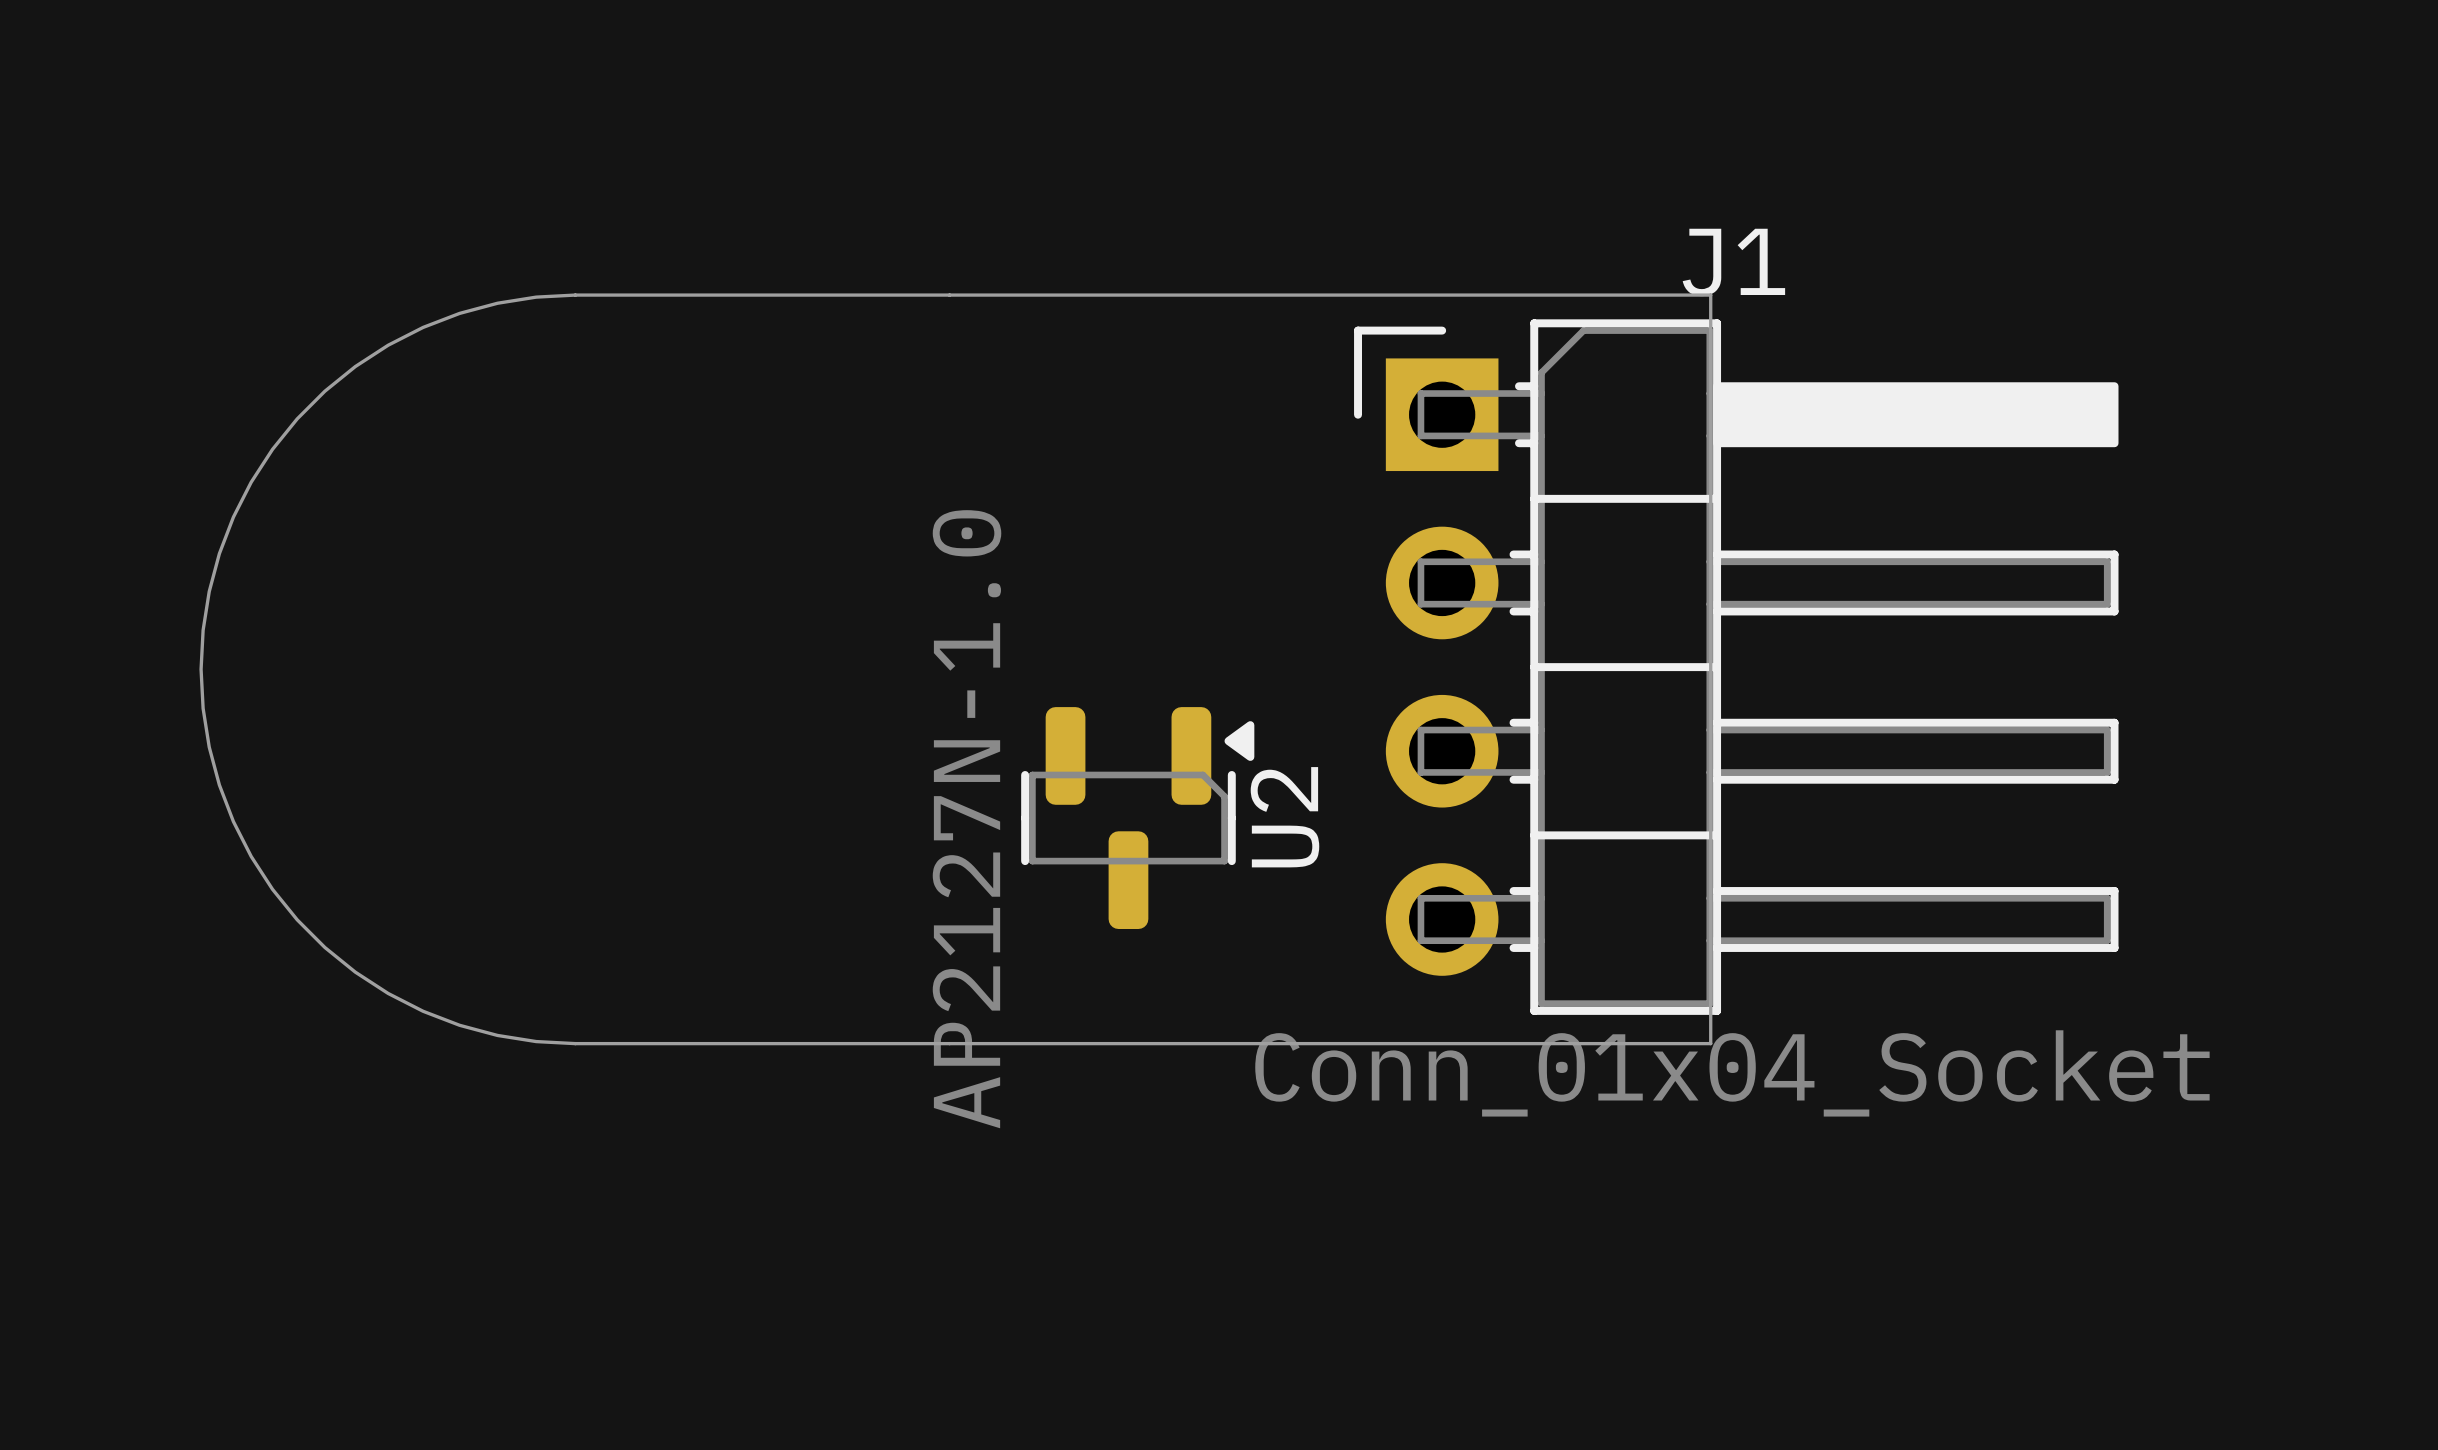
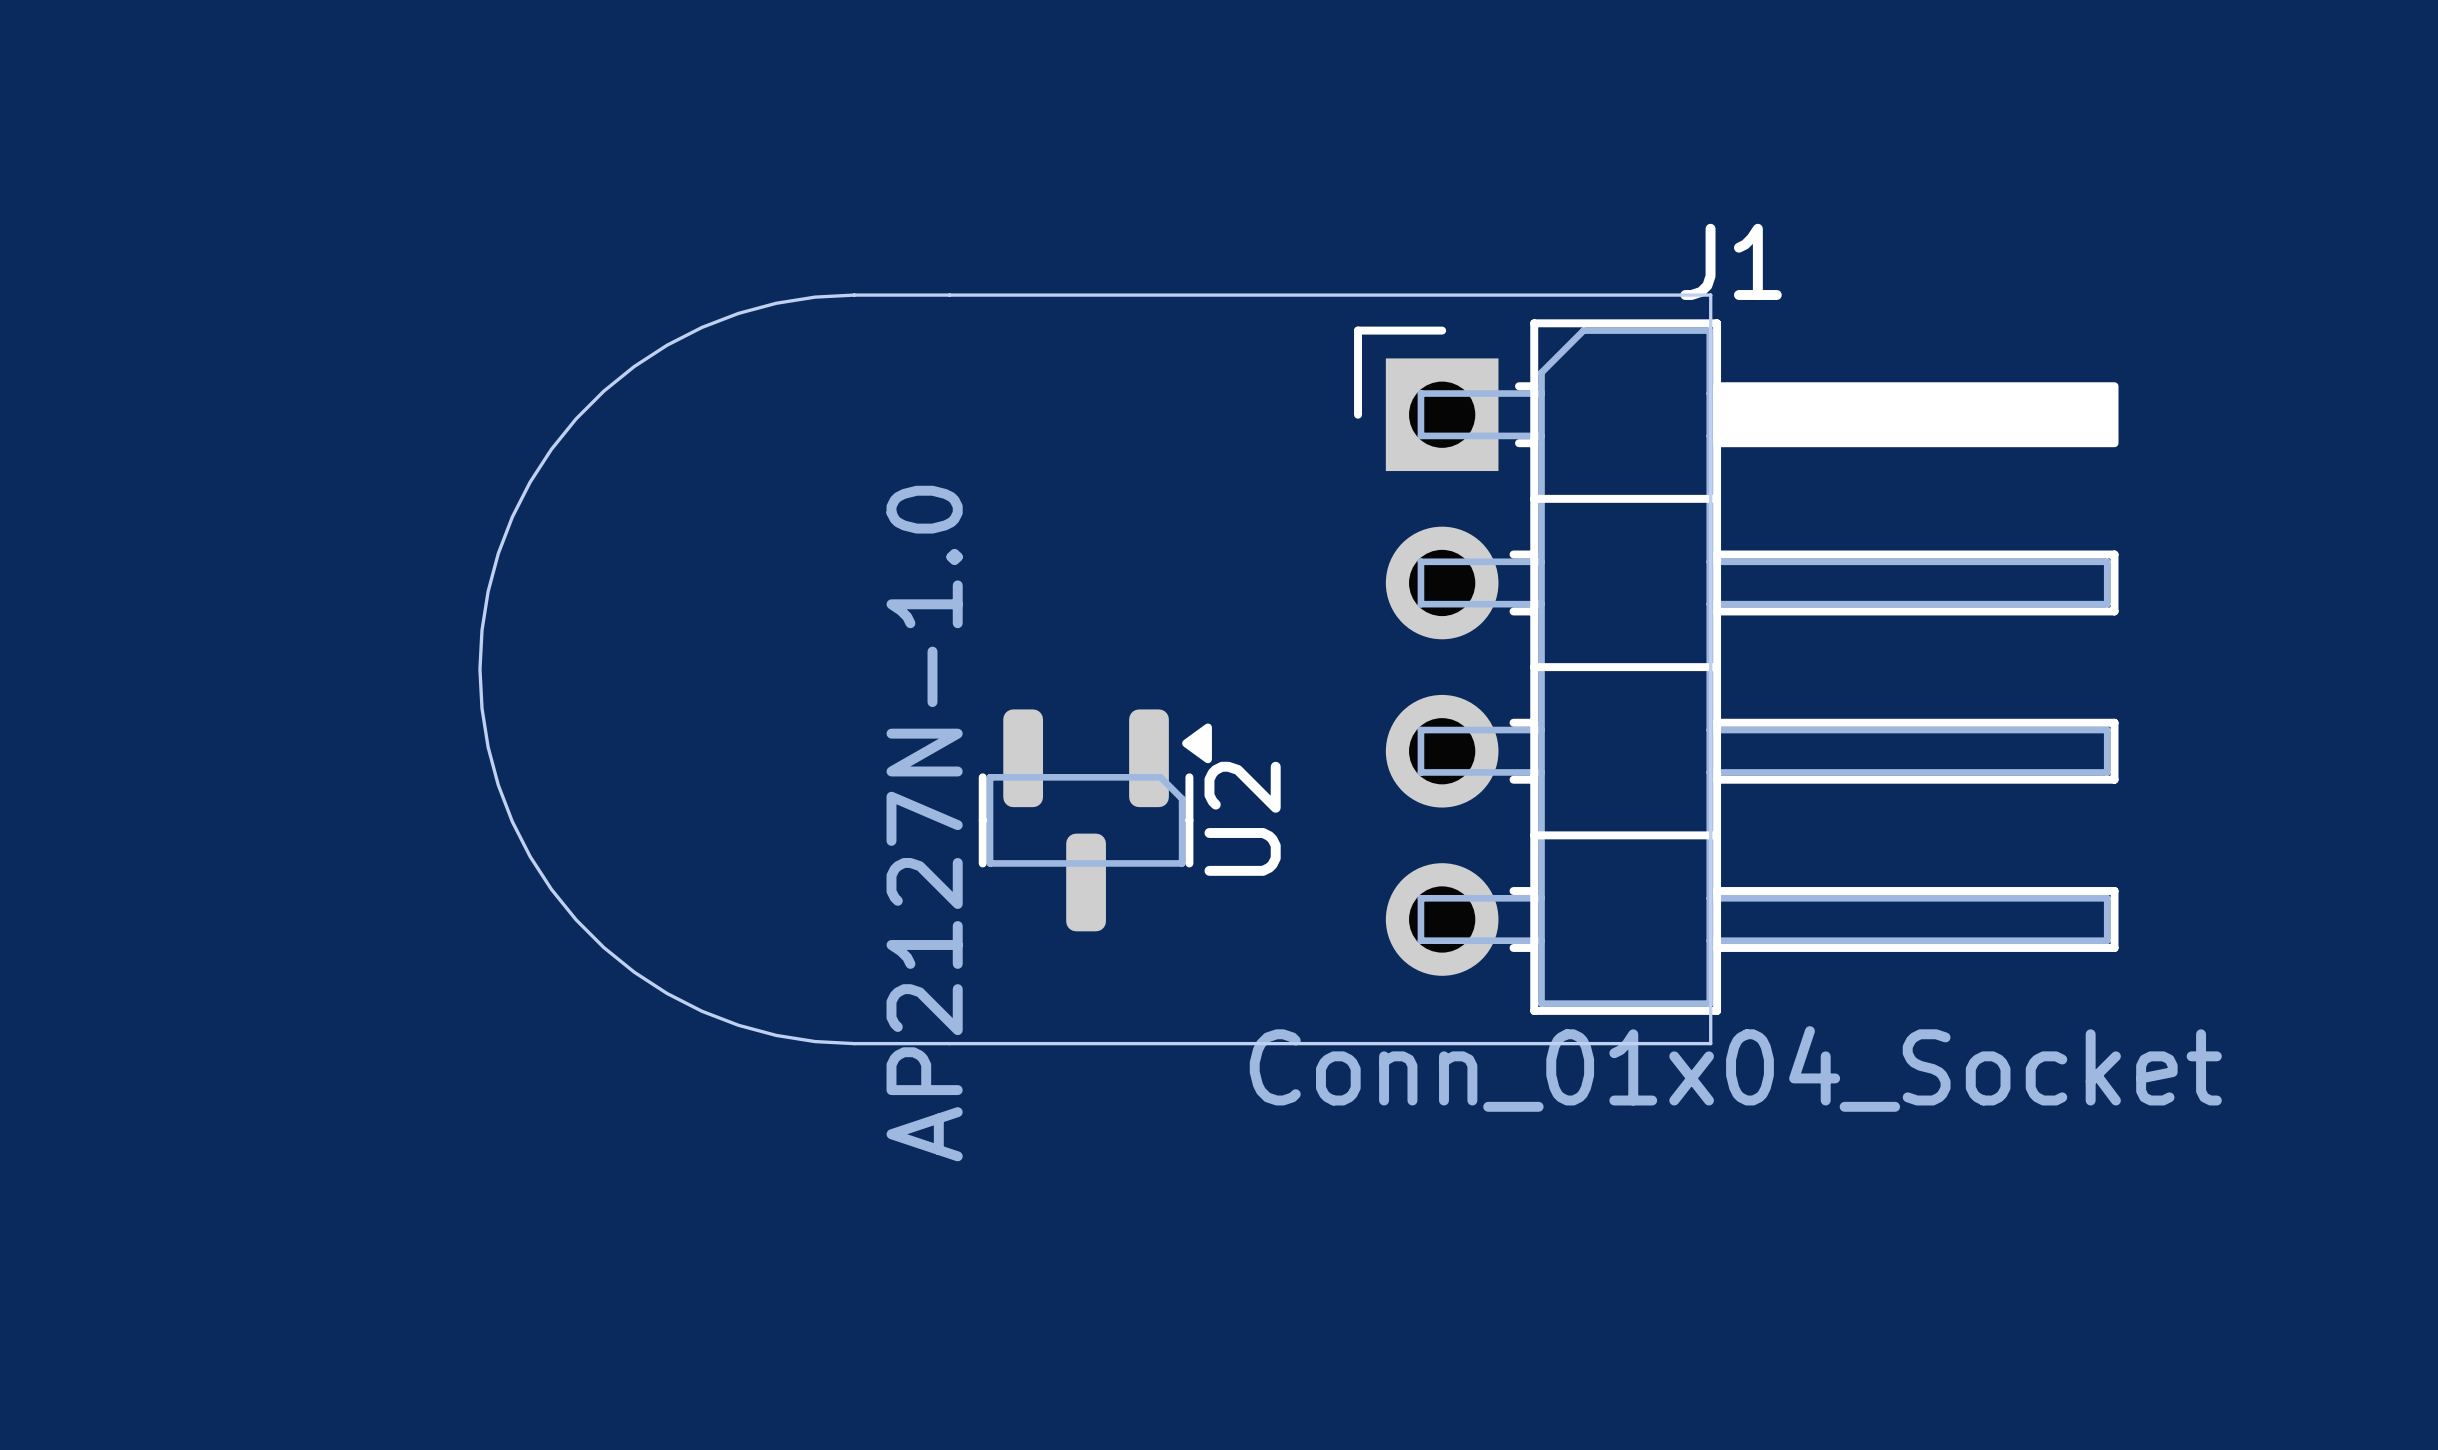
board edge: (854, 295) (575, 295) (536, 297) (497, 303) (459, 313) (423, 327) (388, 345) (355, 366) (324, 391) (297, 418) (272, 449) (251, 482) (233, 517) (219, 553) (209, 591) (203, 630) (201, 669) (203, 708) (209, 747) (219, 785) (233, 821) (251, 856) (272, 889) (297, 919) (324, 947) (355, 972) (388, 993) (423, 1011) (459, 1025) (497, 1035) (536, 1041) (575, 1043) (854, 1043) -> (854, 295) (815, 297) (776, 303) (738, 313) (701, 327) (667, 345) (634, 366) (603, 391) (576, 418) (551, 449) (530, 482) (512, 517) (498, 553) (488, 591) (482, 630) (479, 669) (482, 708) (488, 747) (498, 785) (512, 821) (530, 856) (551, 889) (576, 919) (603, 947) (634, 972) (667, 993) (701, 1011) (738, 1025) (776, 1035) (815, 1041) (854, 1043)
U2 position: (1137, 818) -> (1095, 820)

